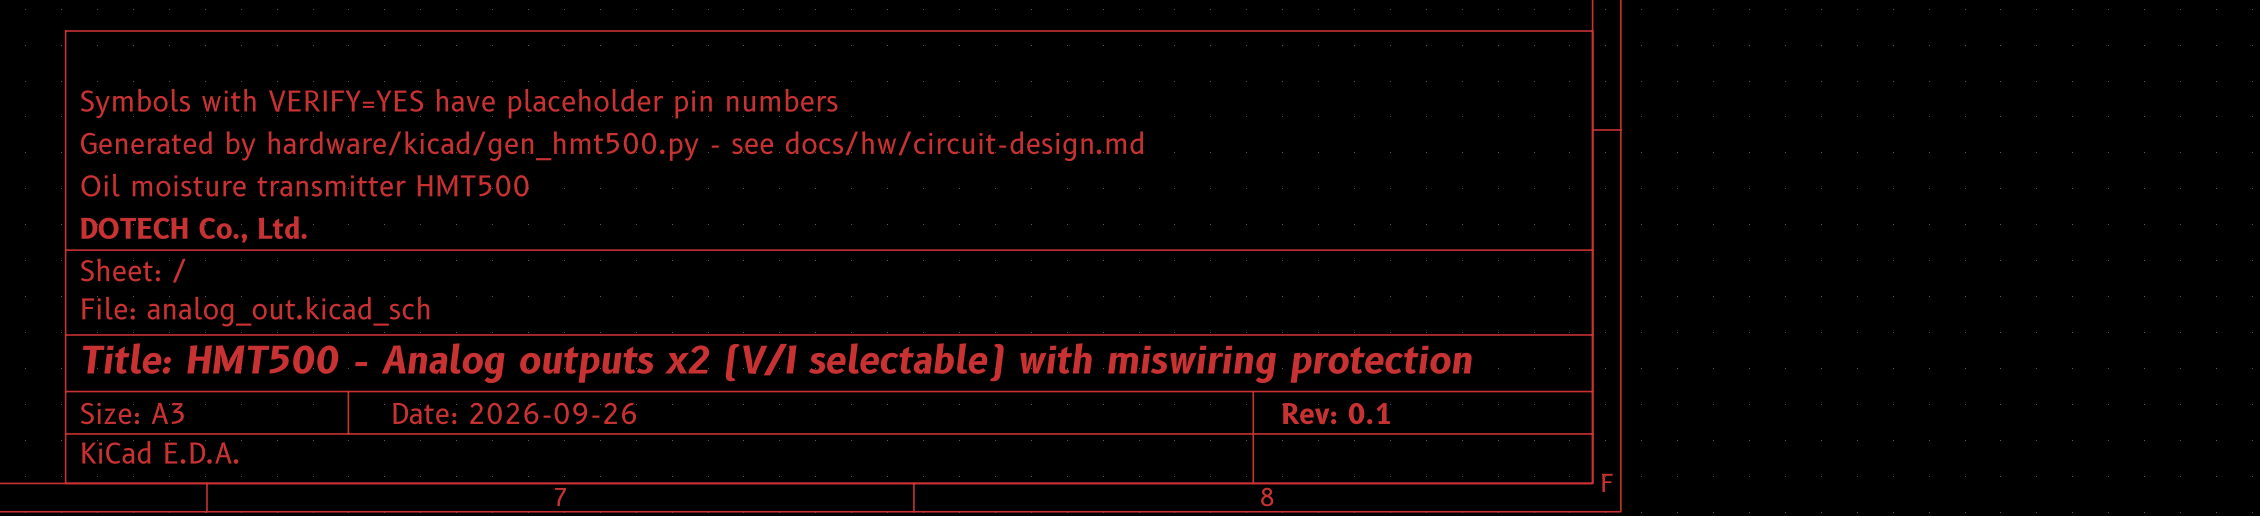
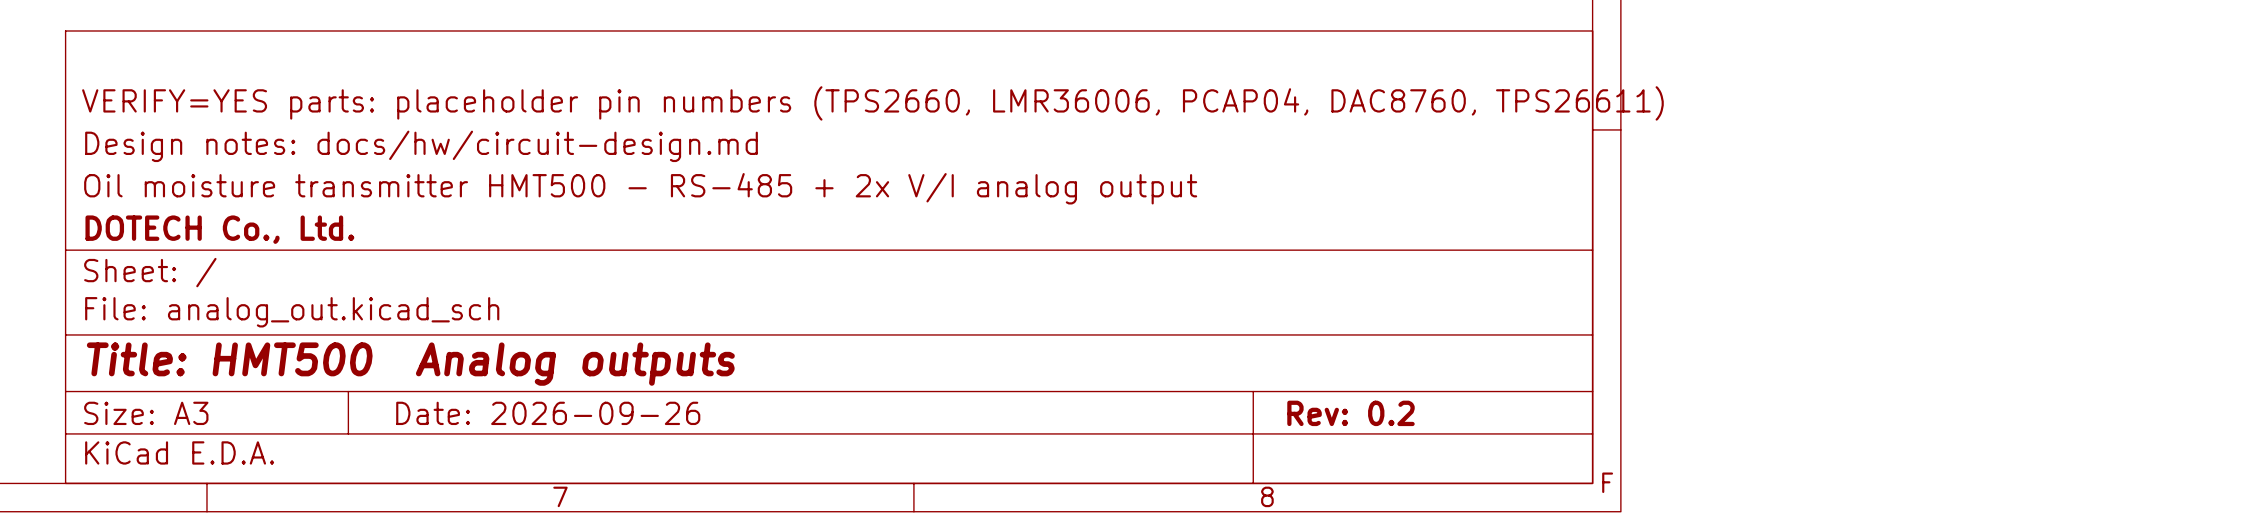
title block: Symbols with VERIFY=YES have placeholder pin numbers (459, 103) -> VERIFY=YES parts: placeholder pin numbers (TPS2660, LMR36006, PCAP04, DAC8760, TPS26611) (872, 103)
title block: Generated by hardware/kicad/gen_hmt500.py - see docs/hw/circuit-design.md (612, 146) -> Design notes: docs/hw/circuit-design.md (421, 146)
title block: Oil moisture transmitter HMT500 (304, 185) -> Oil moisture transmitter HMT500 - RS-485 + 2x V/I analog output (640, 188)
title block: Title: HMT500 - Analog outputs x2 (V/I selectable) with miswiring protection (777, 363) -> Title: HMT500 Analog outputs (410, 364)
title block: Rev: 0.1 (1336, 413) -> Rev: 0.2 (1350, 413)

